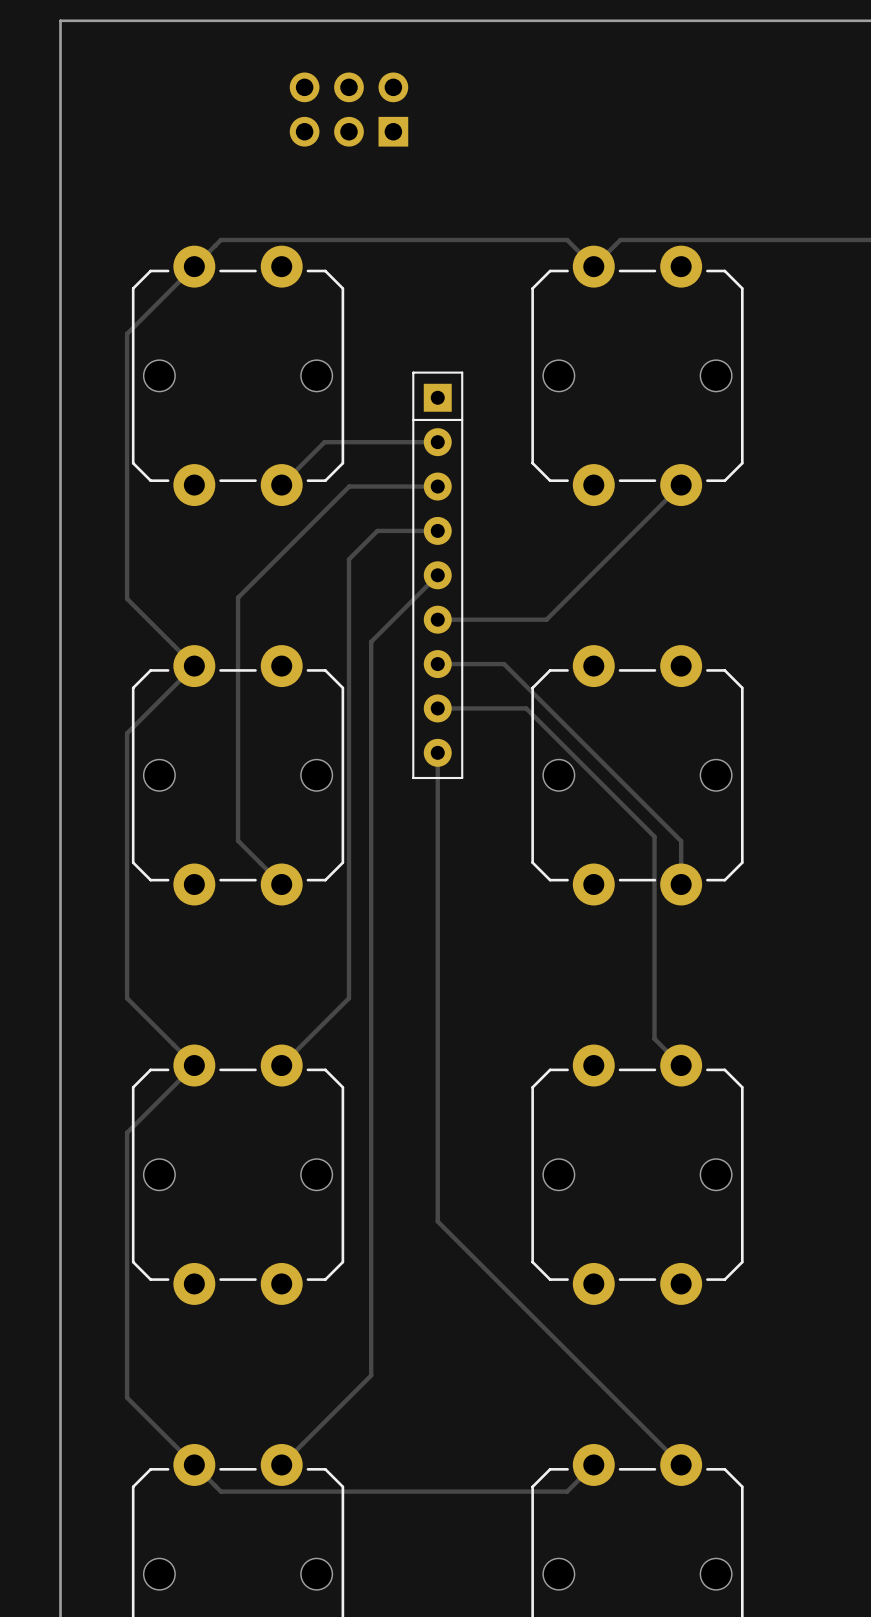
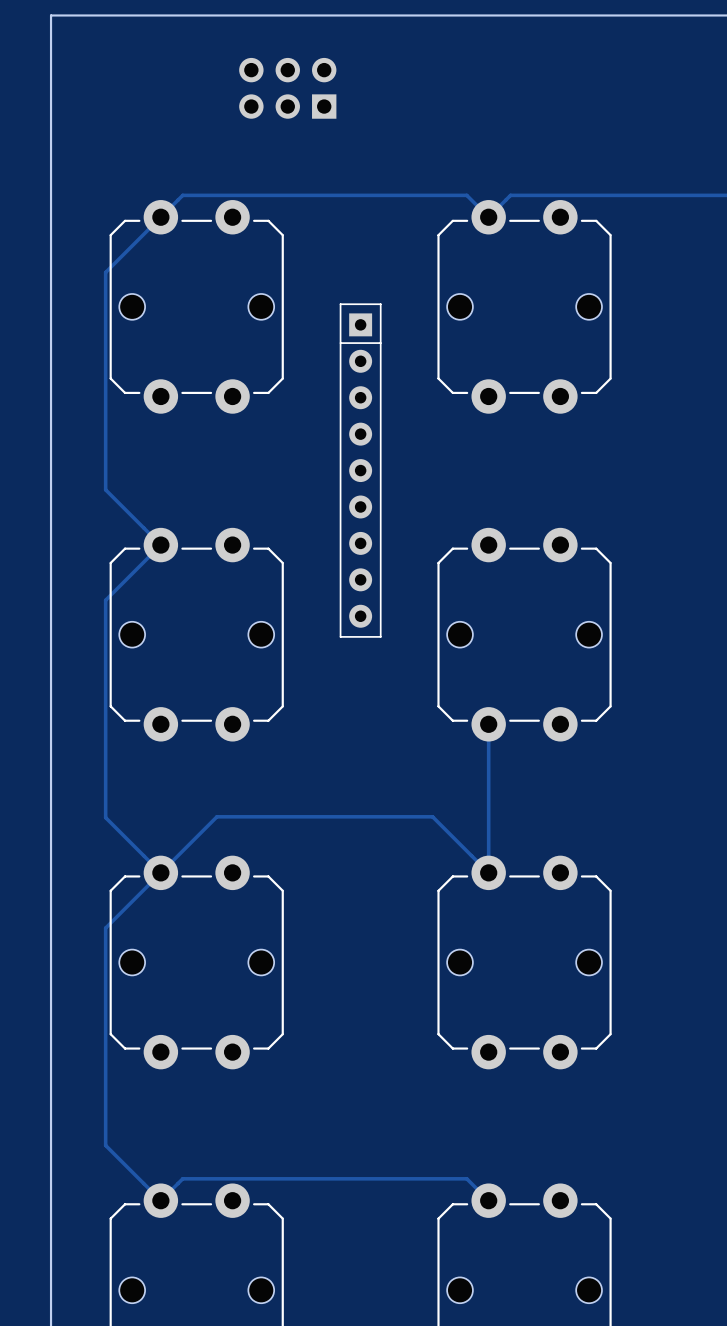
track: (437, 442) (324, 442) (281, 485) -> none
track: (681, 485) (546, 619) (437, 619) -> none
track: (437, 486) (349, 486) (238, 597) (238, 840) (281, 884) -> none
track: (437, 530) (377, 530) (348, 559) (348, 998) (281, 1065) -> none
track: (437, 575) (371, 641) (371, 1375) (281, 1464) -> none
track: (437, 664) (504, 664) (681, 841) (681, 884) -> none
track: (437, 708) (526, 708) (654, 836) (654, 1038) (681, 1065) -> none
track: (437, 752) (437, 1221) (681, 1464) -> none
track: none -> (488, 724) (488, 872) (432, 816) (216, 816) (160, 872)
track: (194, 1464) (220, 1491) (567, 1491) (593, 1464) -> (160, 1200) (182, 1178) (466, 1178) (488, 1200)

